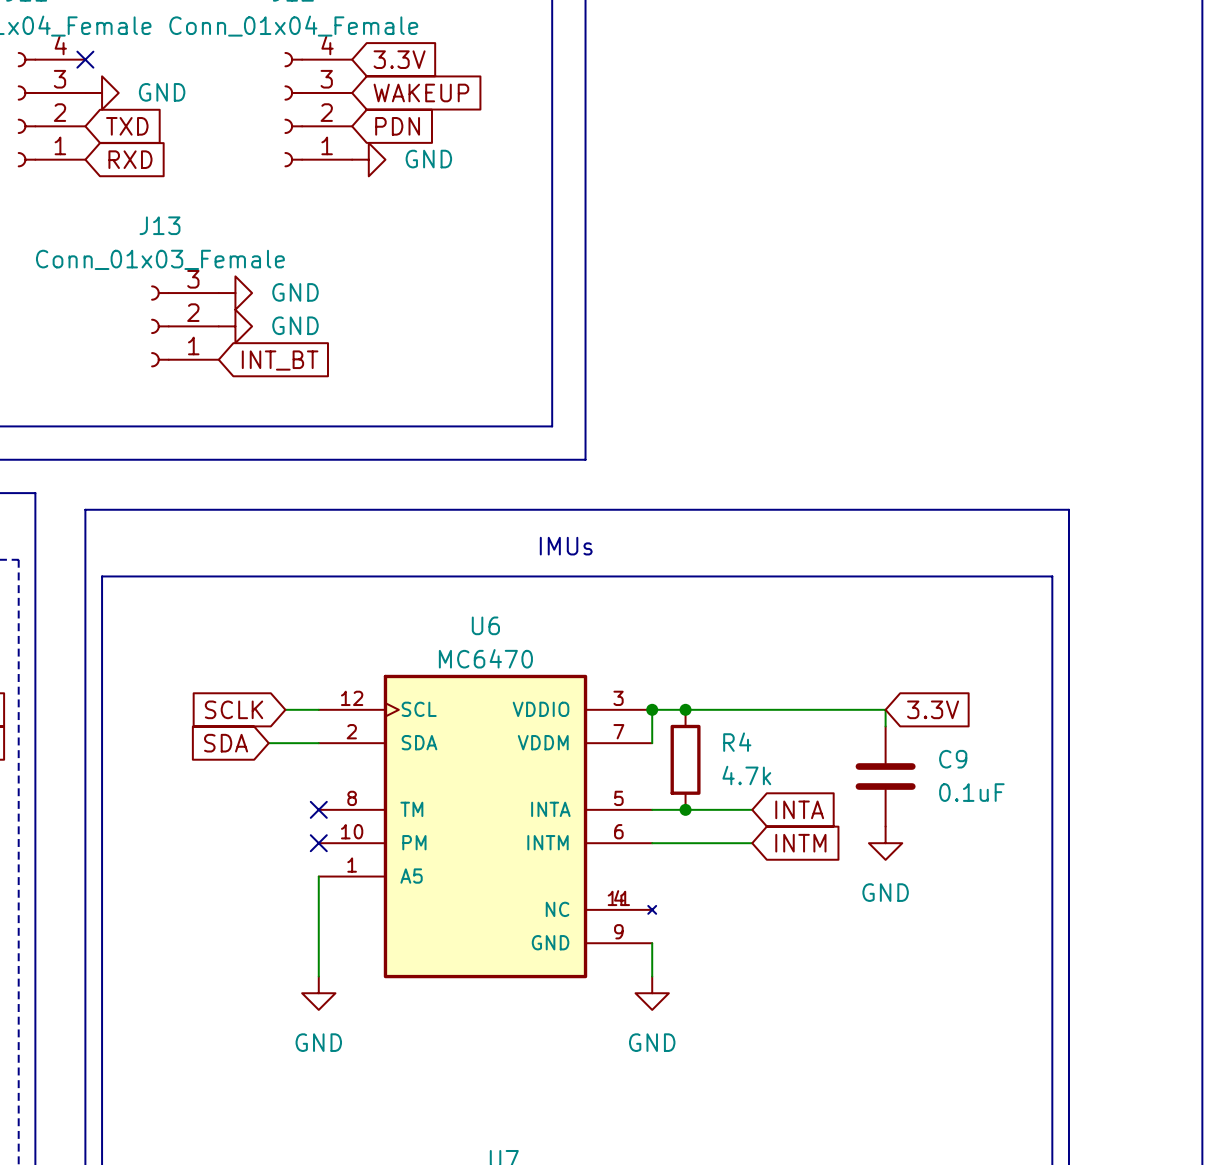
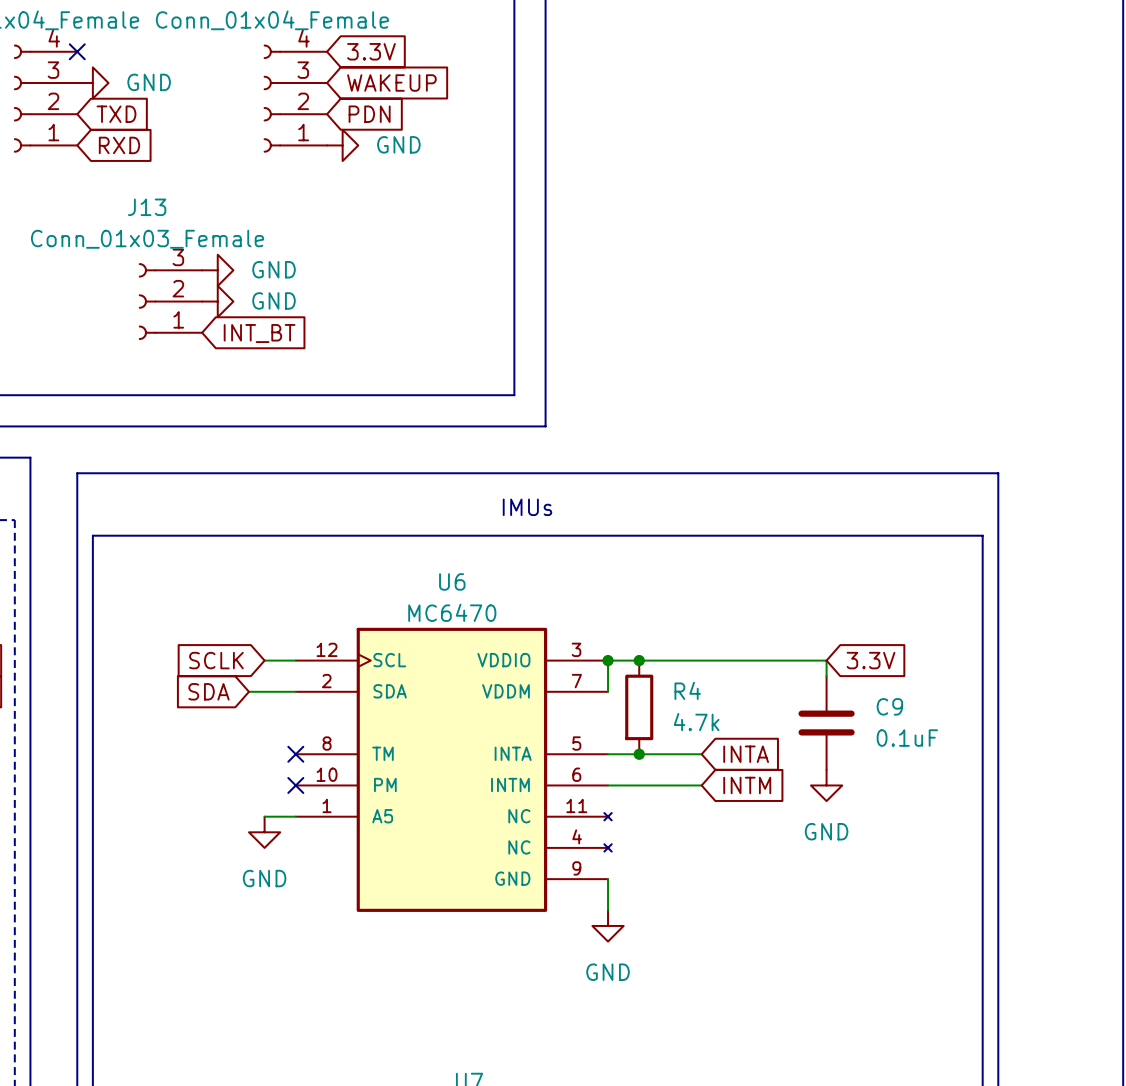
U6 symbol: [318, 674, 657, 979] -> [295, 627, 612, 912]
wire: (318, 876) (318, 976) -> (295, 816) (264, 816)
power symbol position: GND (318, 993) -> GND (264, 832)

